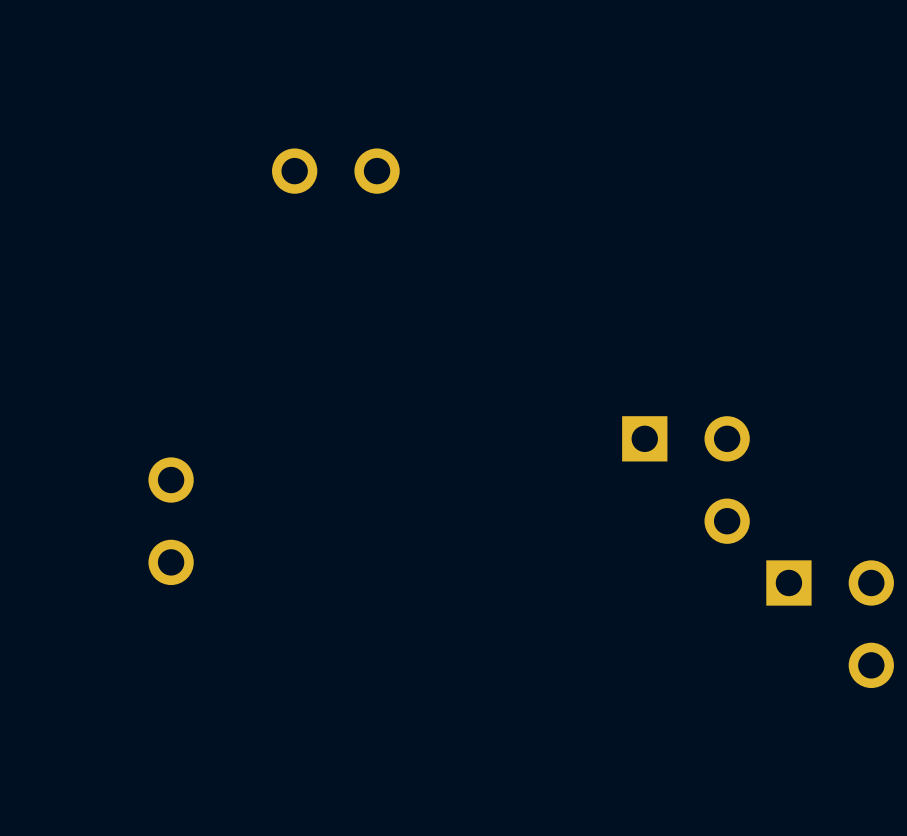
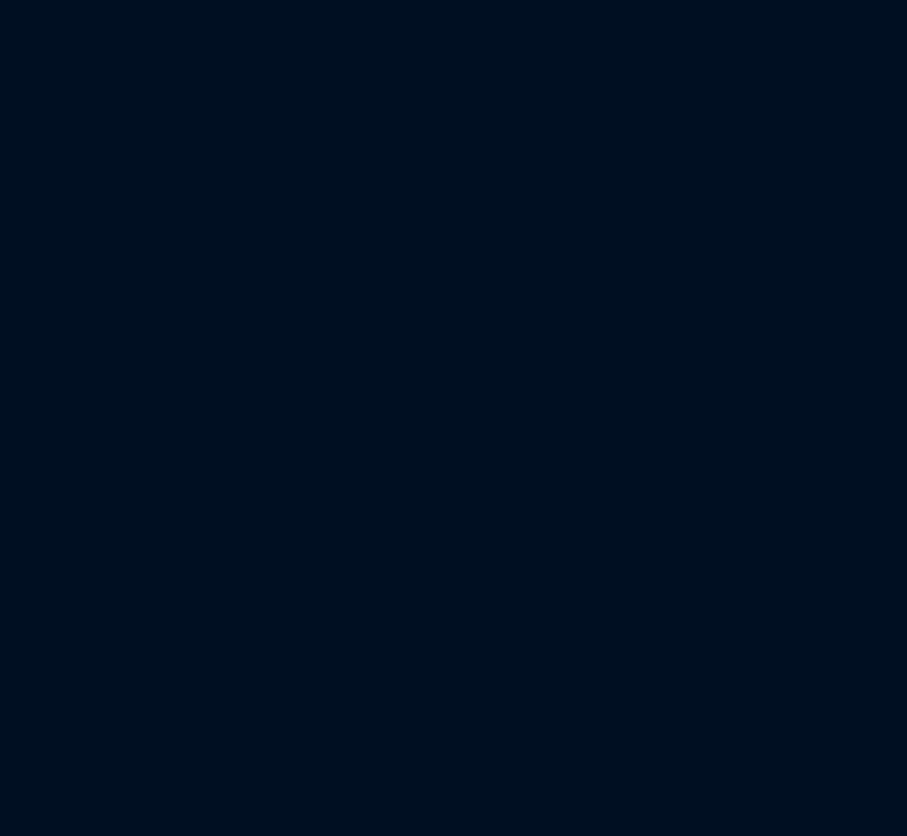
part: (335, 171) -> none
part: (685, 480) -> none
part: (171, 521) -> none
part: (830, 624) -> none

